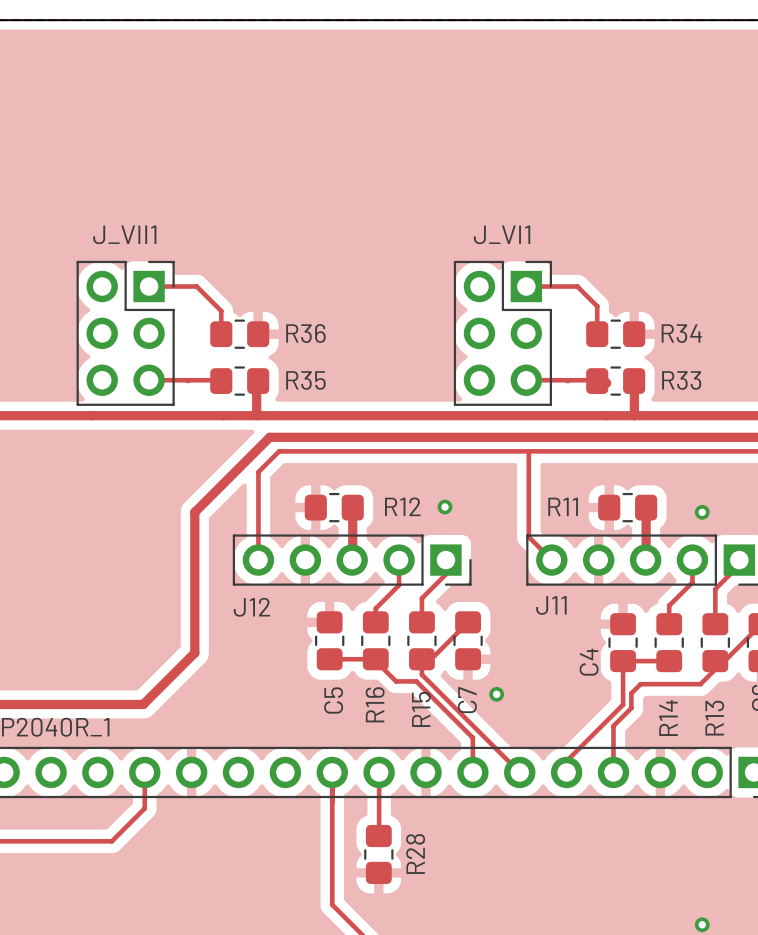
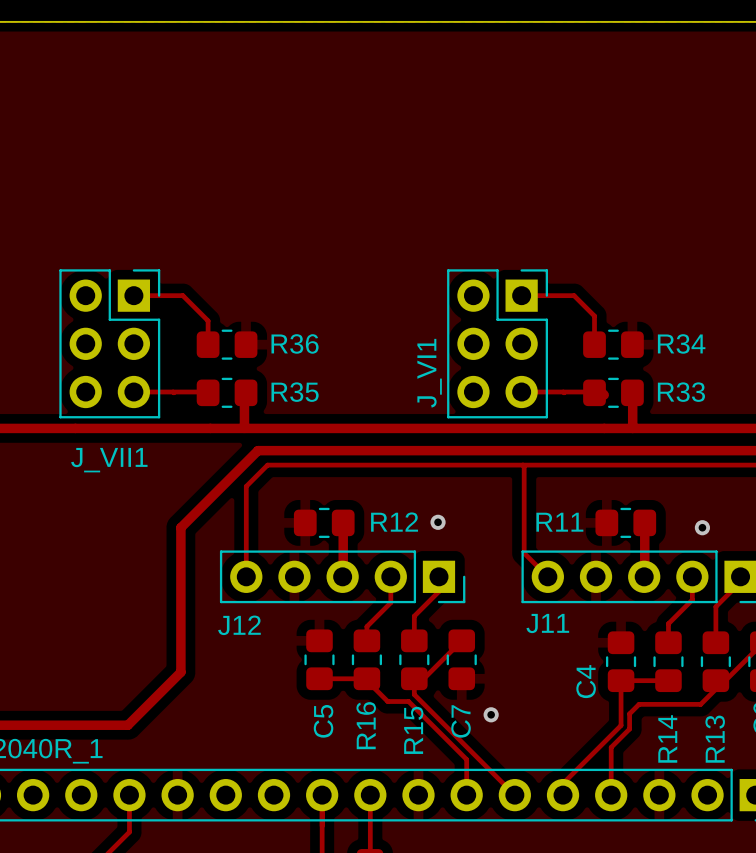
J_VII1 name position: J_VII1 (124, 234) -> J_VII1 (109, 460)
J_VI1 name rotation: 0° (502, 234) -> 90° counterclockwise (429, 373)
J_VI1 name position: J_VI1 (502, 234) -> J_VI1 (429, 373)

